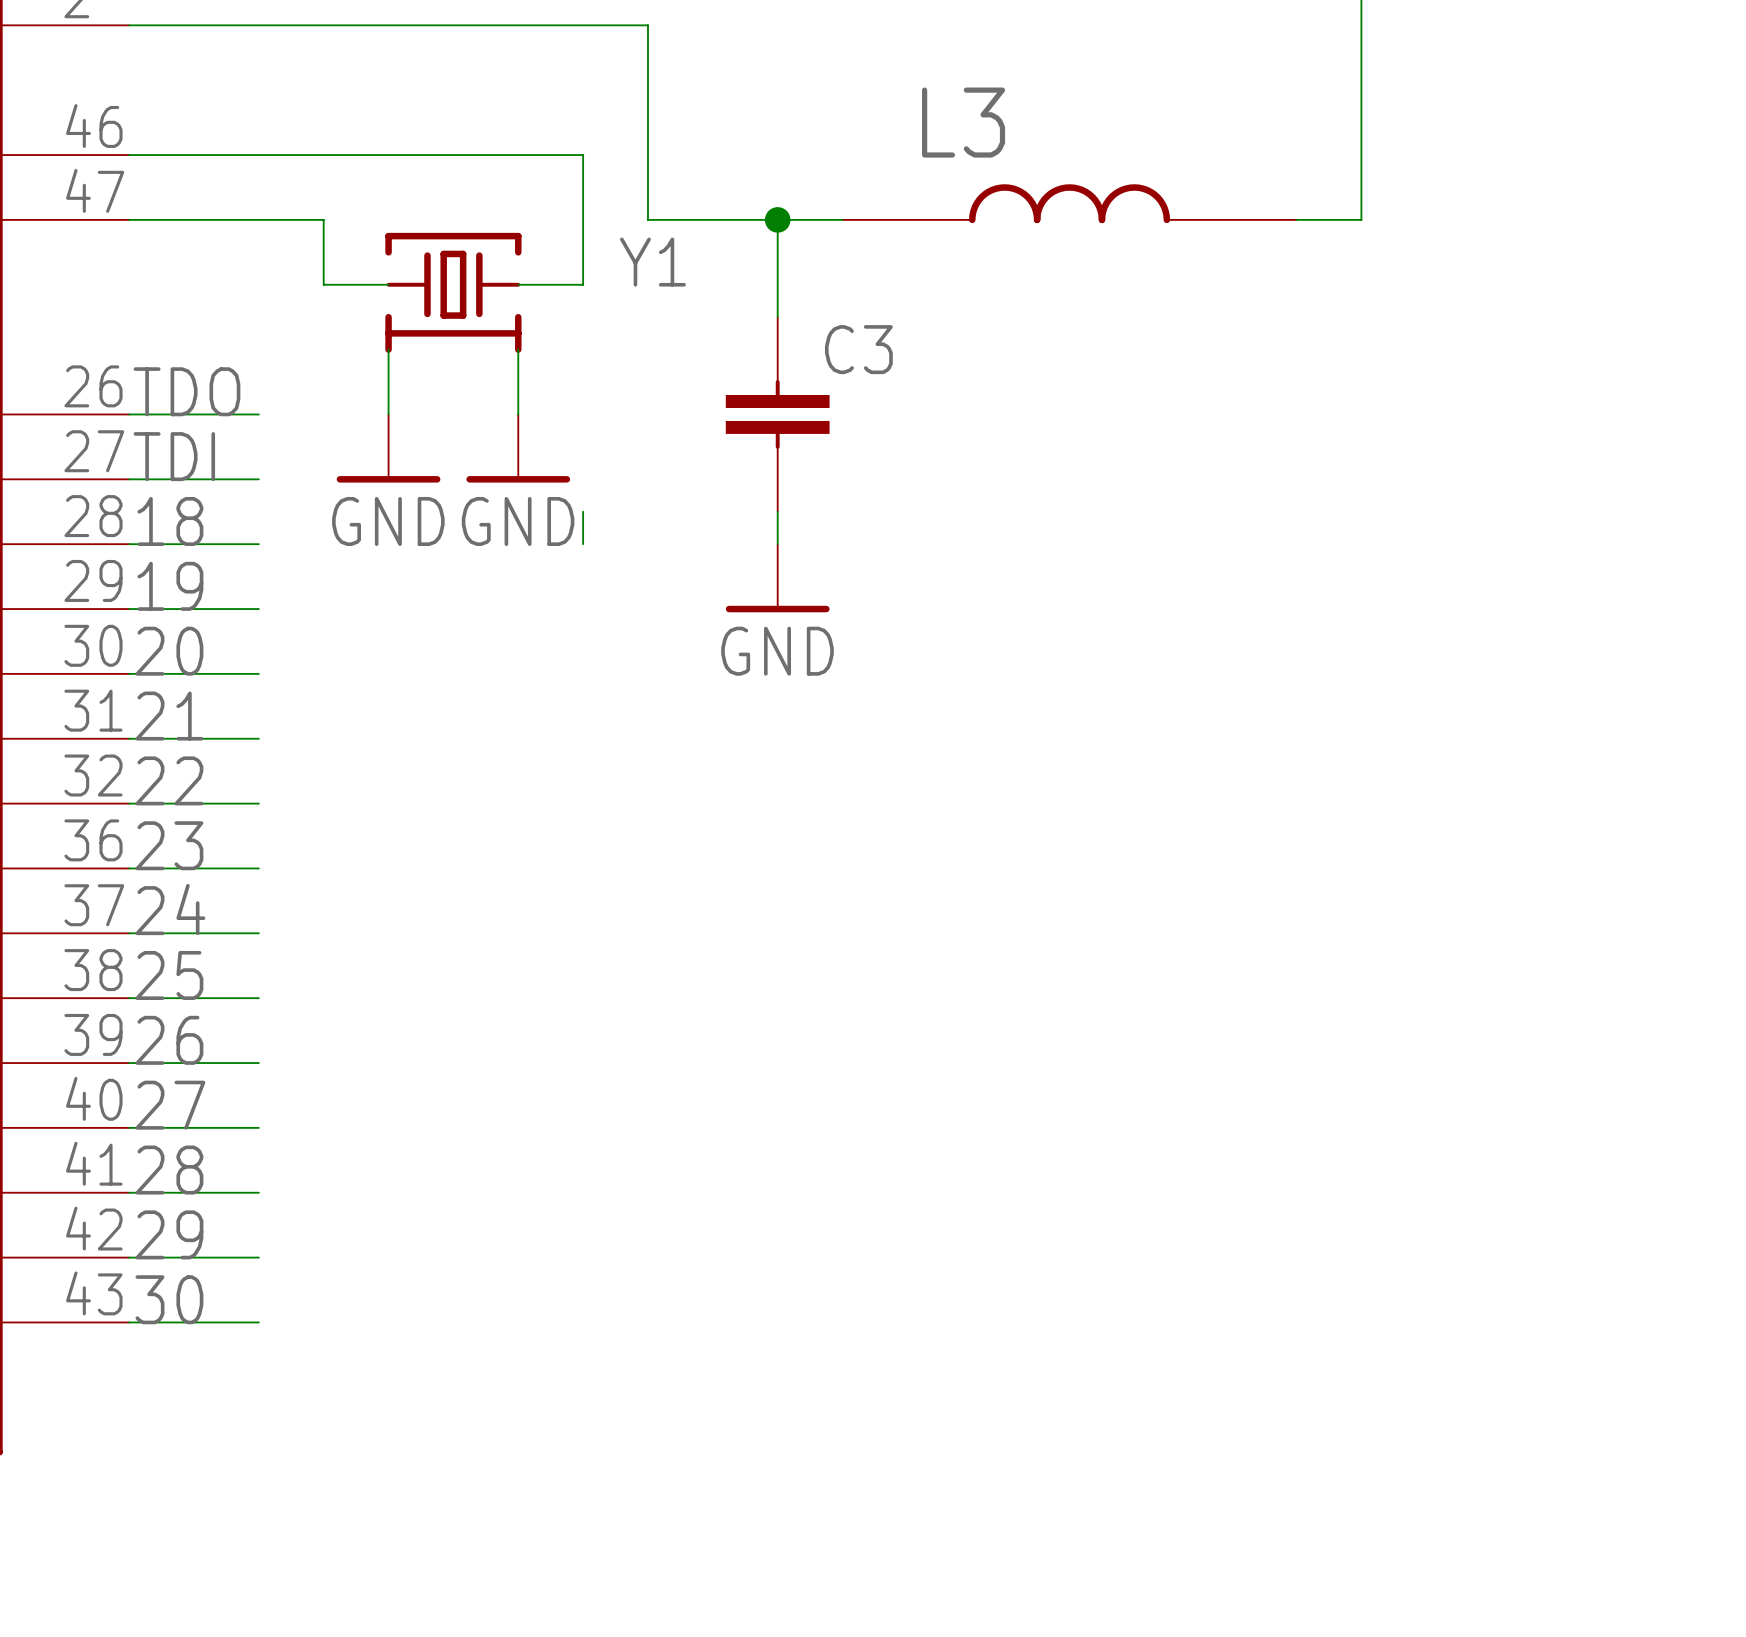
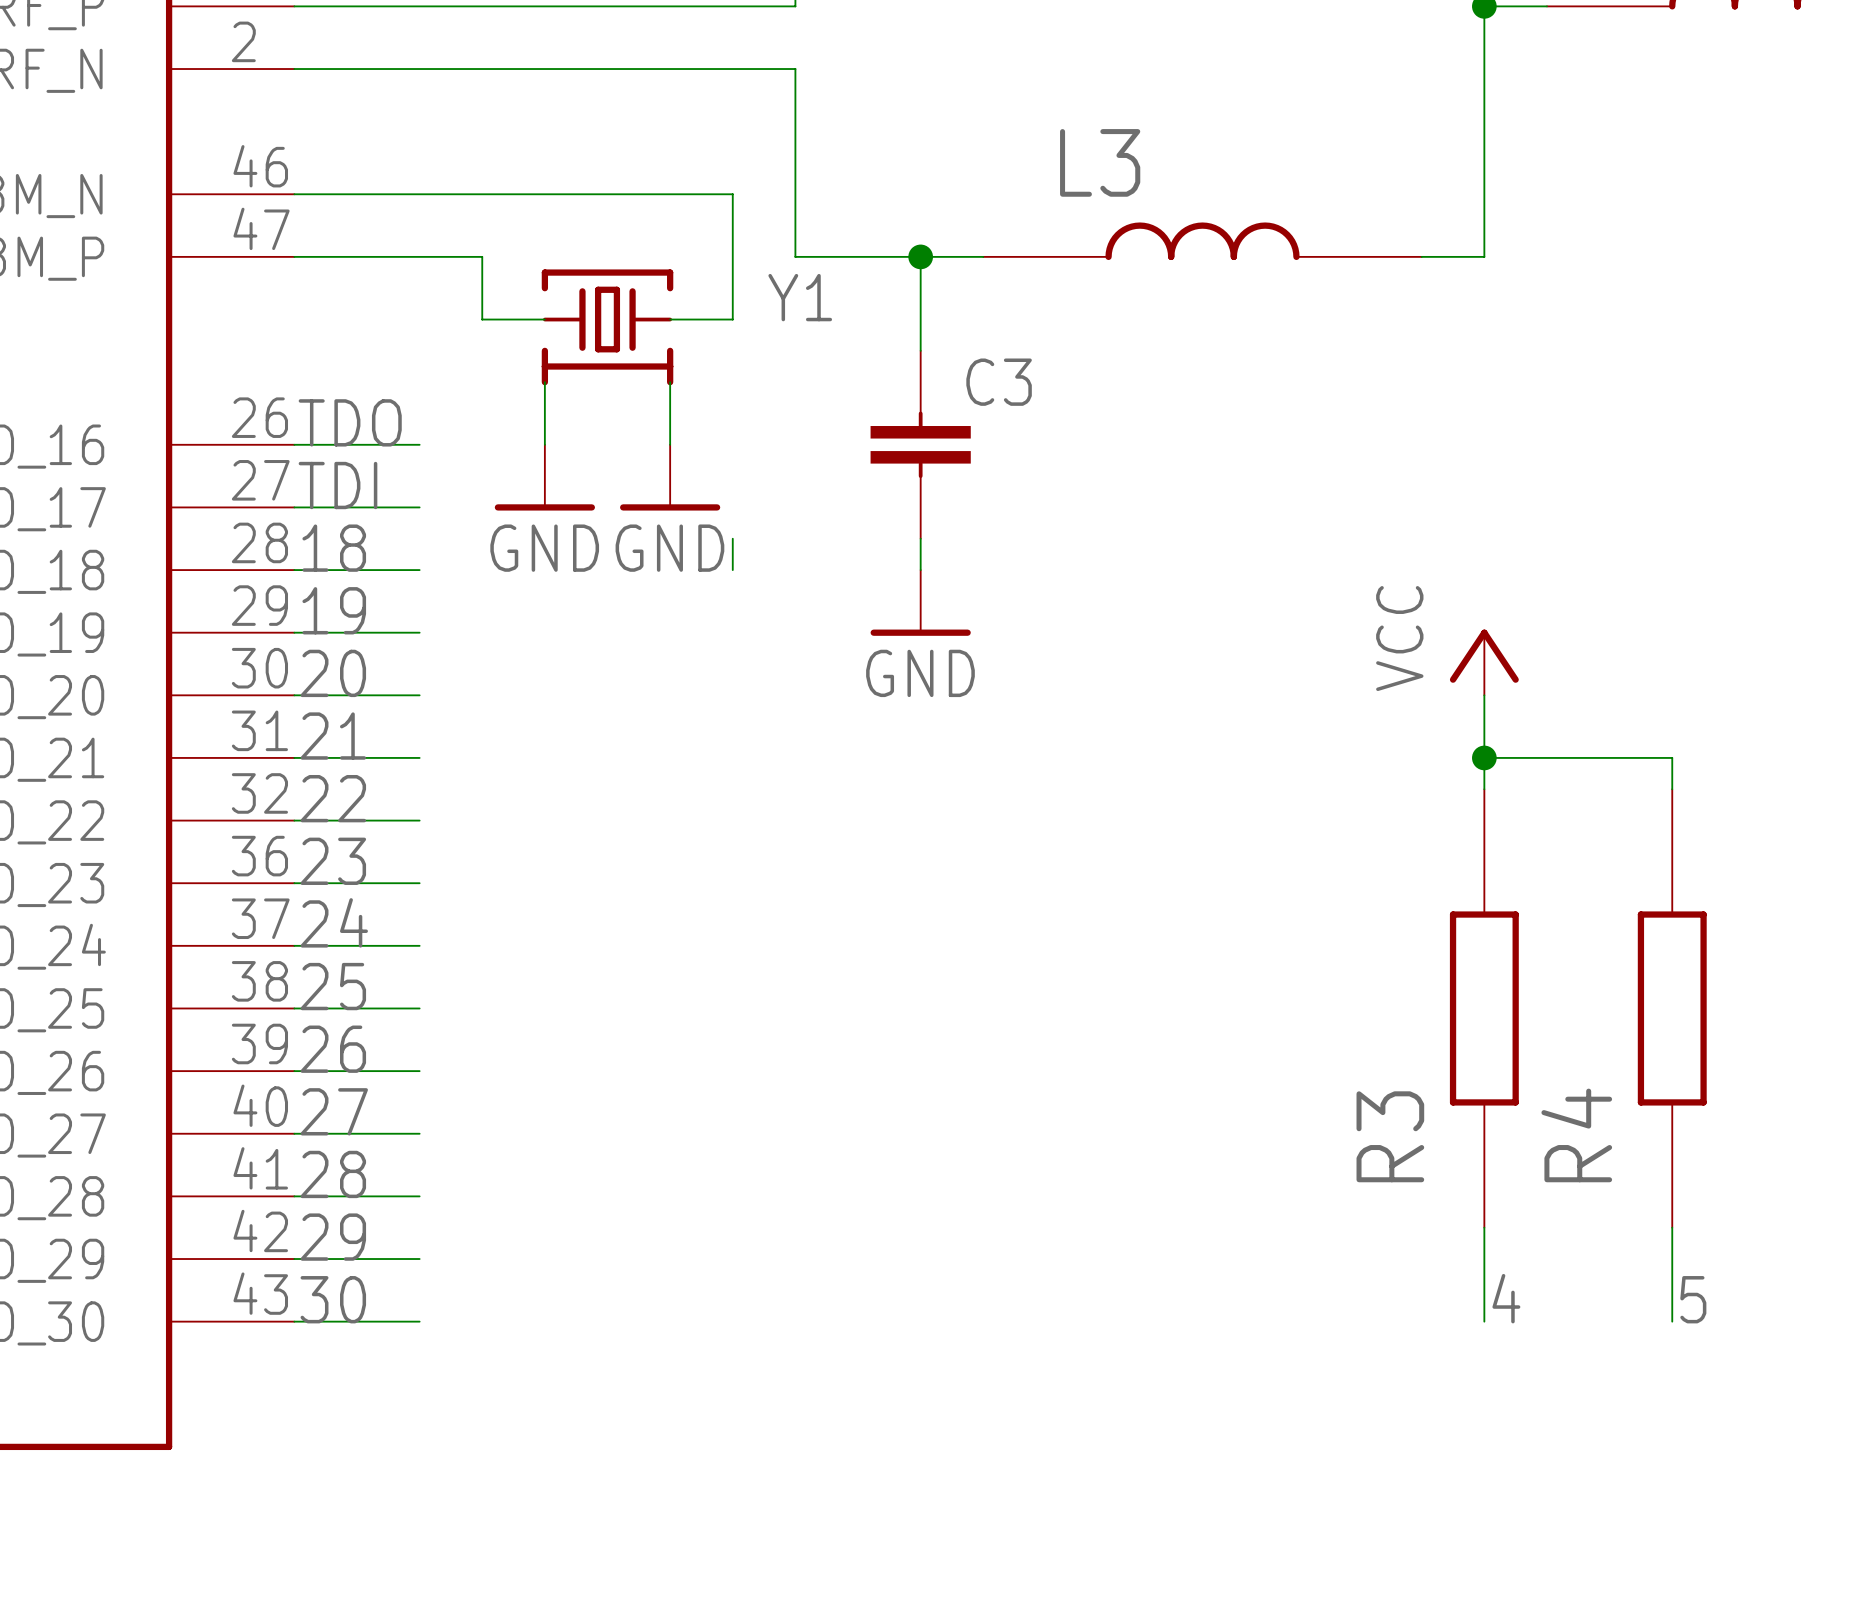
power symbol: none -> VCC (1484, 662)
wire: none -> (1484, 695) (1484, 789)
wire: none -> (1484, 757) (1672, 757) (1672, 789)
junction: none -> (1484, 757)
R3: none -> (1484, 1008)
R4: none -> (1672, 1008)
wire: none -> (1484, 1227) (1484, 1321)
wire: none -> (1672, 1227) (1672, 1321)
label: none -> 4 (1506, 1298)
label: none -> 5 (1693, 1299)

